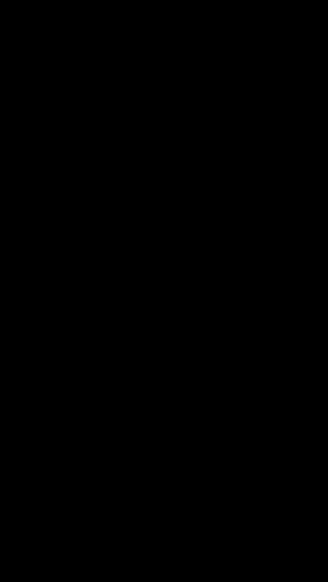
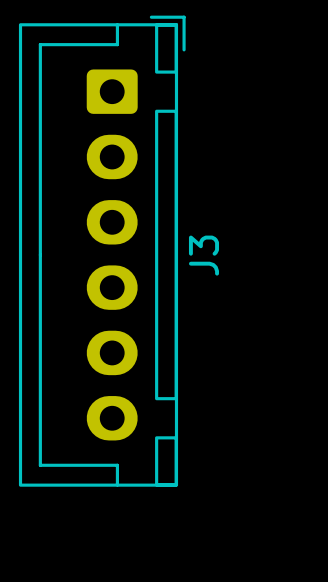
J3: none -> (102, 251)

